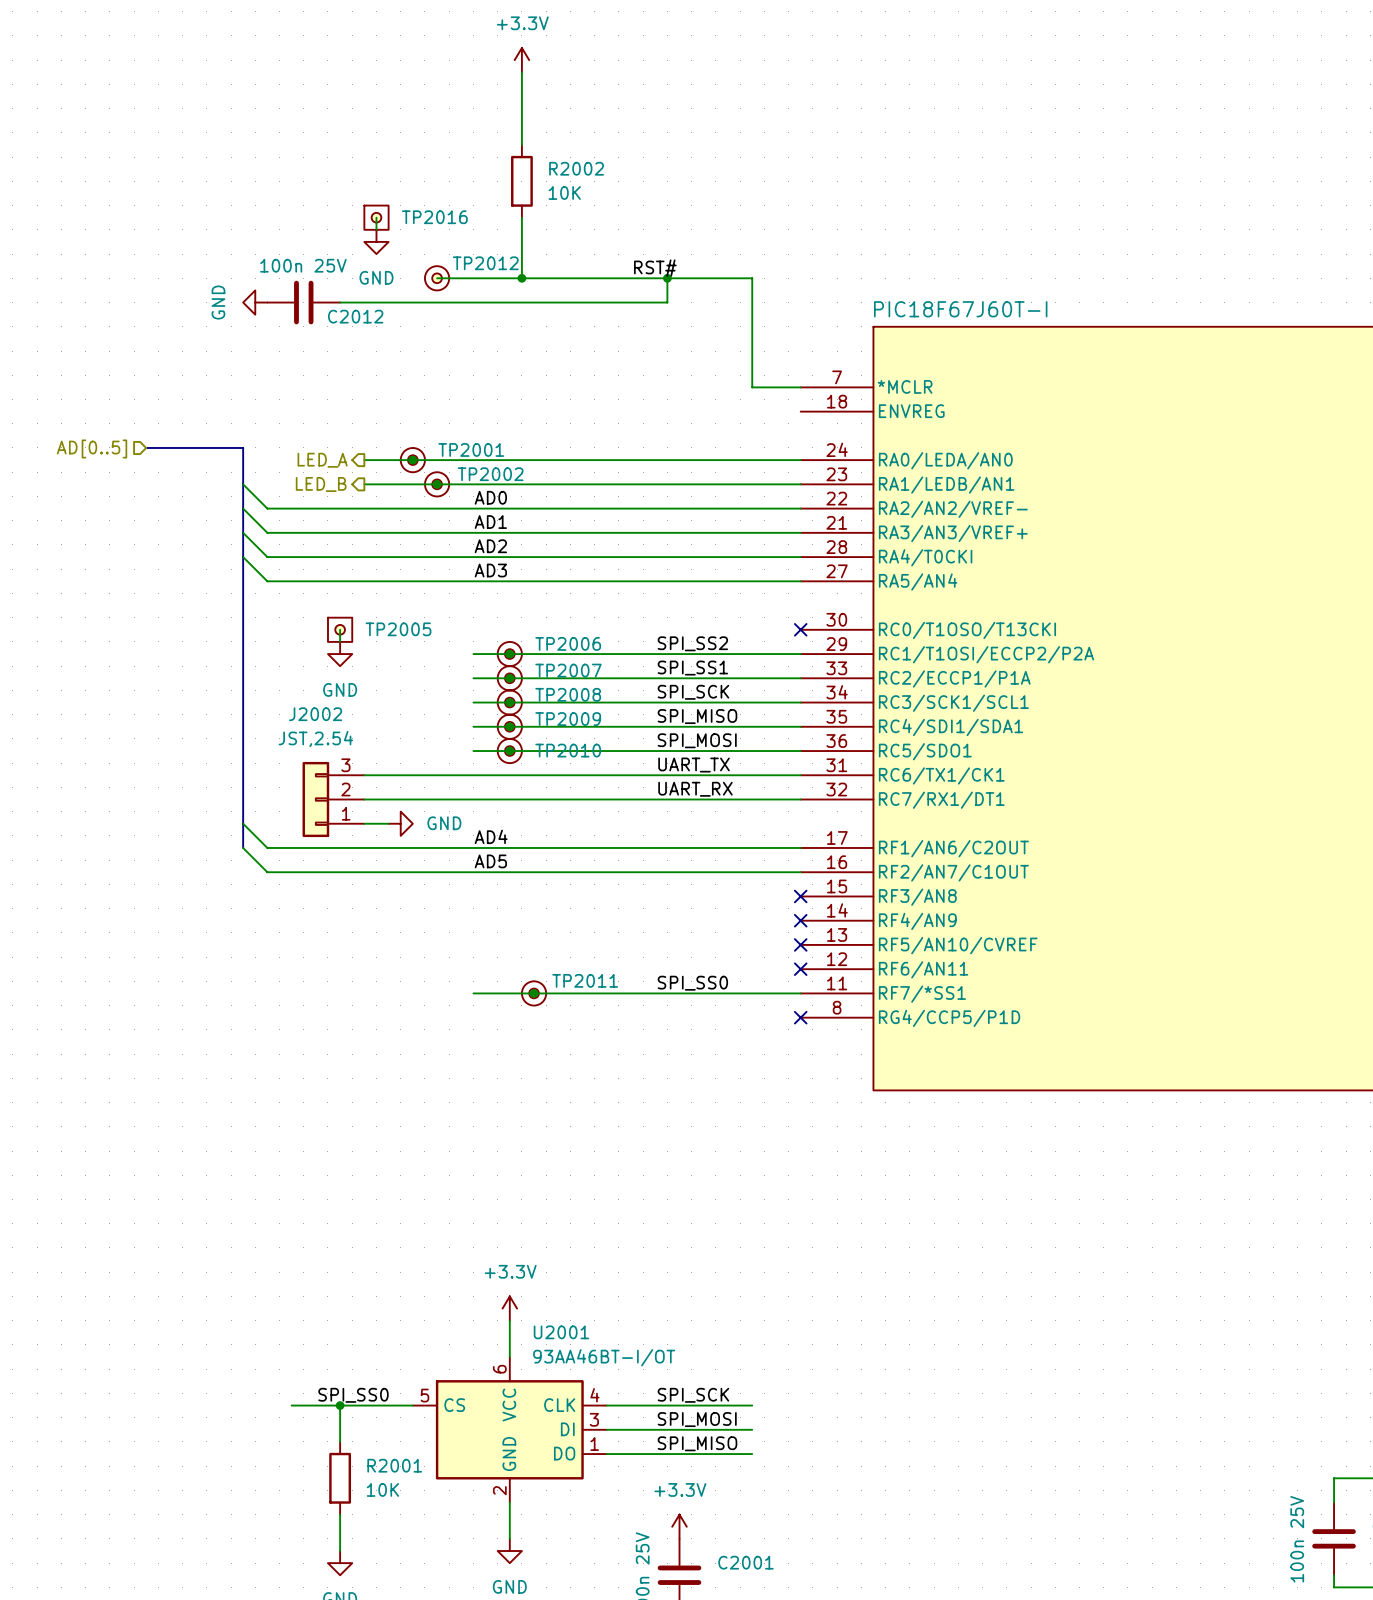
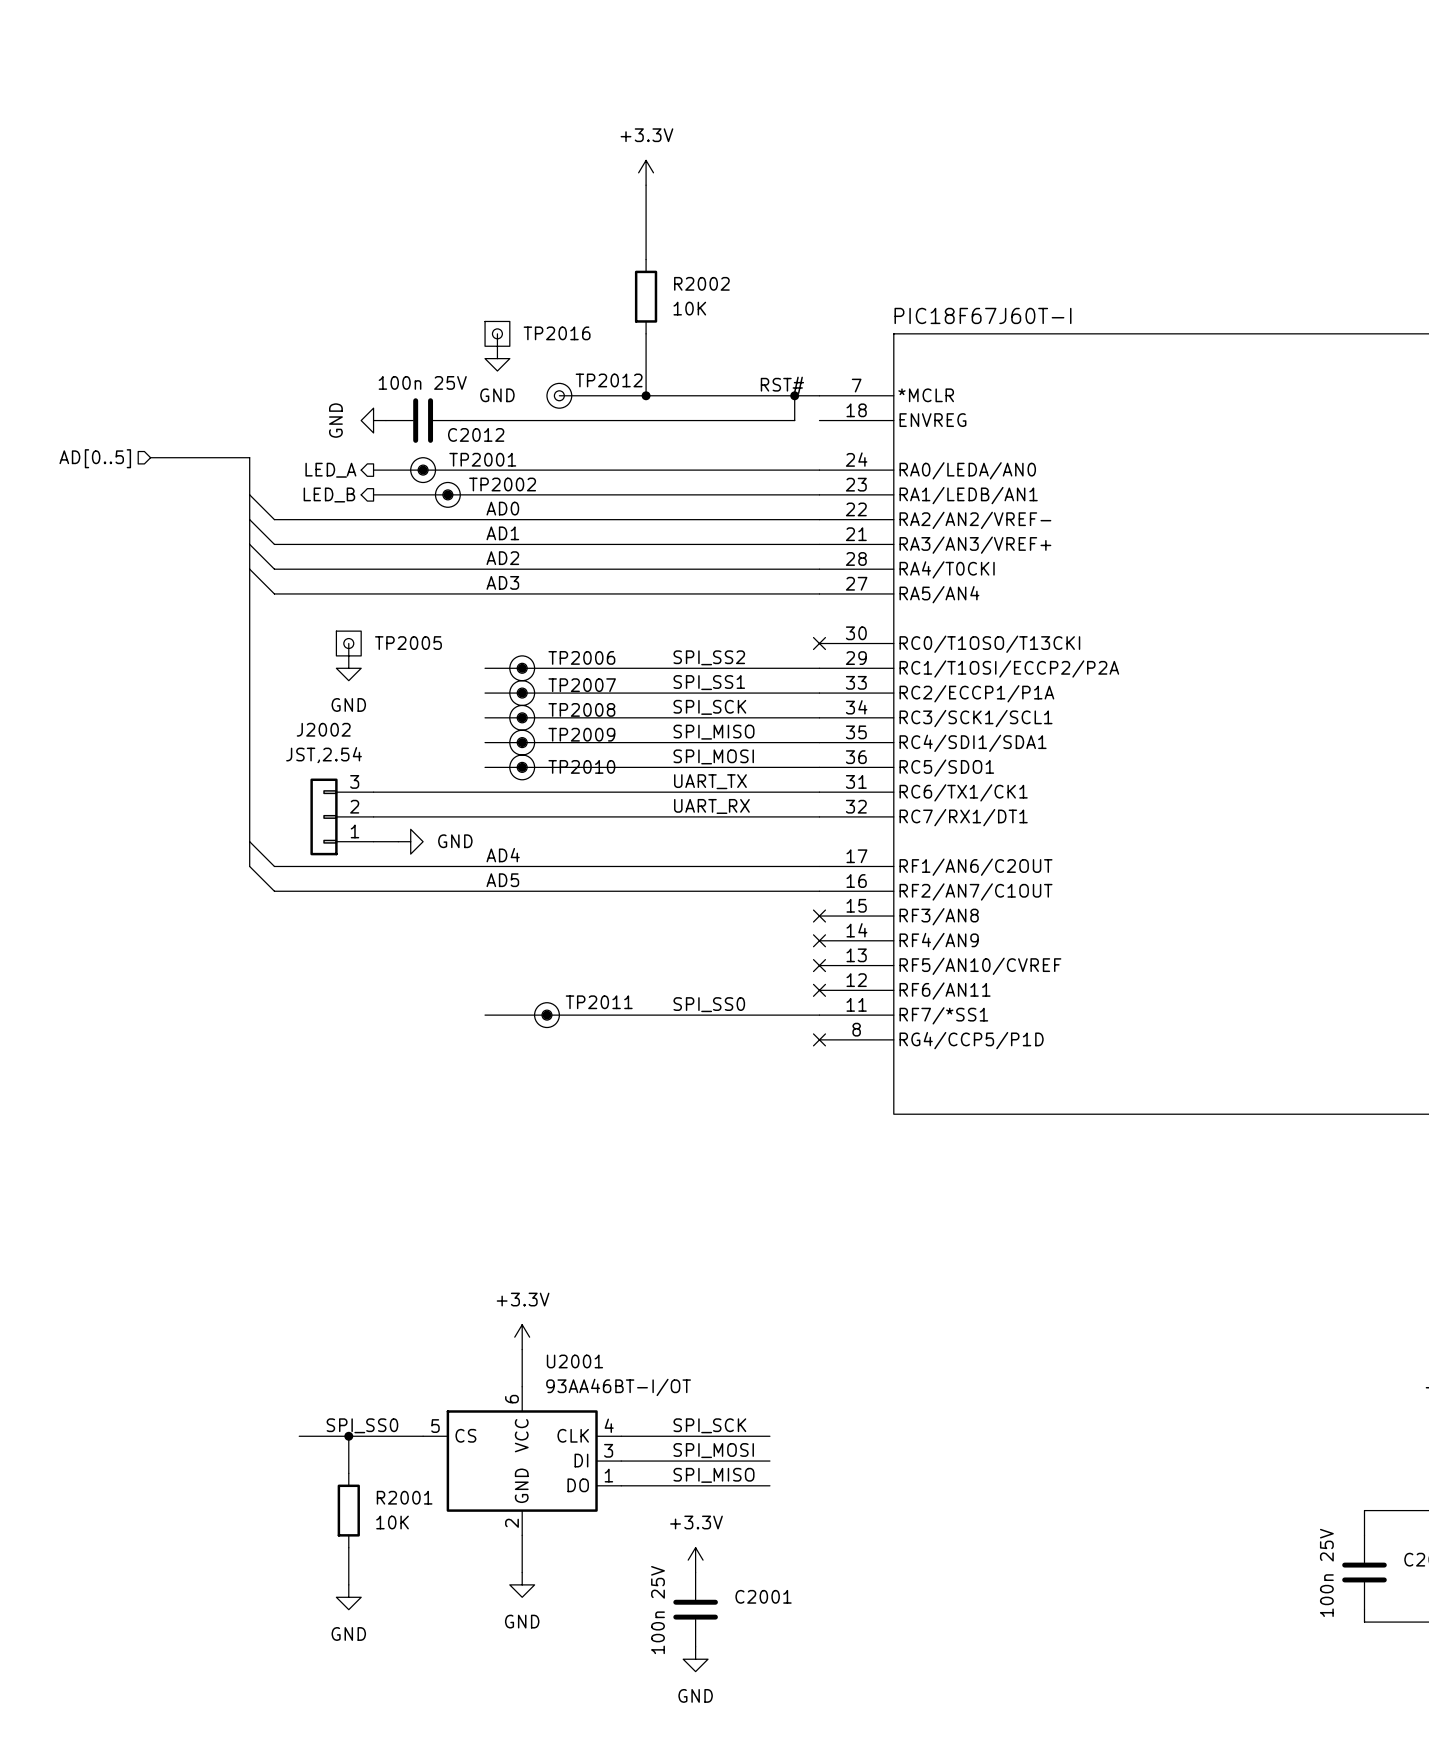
power symbol position: +3.3V (521, 60) -> +3.3V (646, 172)
wire: (521, 72) (521, 144) -> (646, 185) (646, 259)
R2002 position: (521, 181) -> (646, 296)
wire: (376, 217) (376, 229) -> (497, 333) (497, 346)
TP2016 position: (376, 217) -> (497, 333)
wire: (521, 217) (521, 278) -> (646, 333) (646, 395)
power symbol: GND (376, 241) -> none
label position: RST# (655, 268) -> RST# (782, 385)
wire: (437, 278) (752, 278) (752, 387) -> (559, 395) (769, 395)
TP2012 position: (437, 278) -> (559, 395)
junction: (521, 278) -> none
wire: (667, 278) (667, 302) (340, 302) -> (794, 395) (794, 420) (460, 420)
junction: (667, 278) -> none
power symbol: GND (255, 302) -> none
C2012 position: (303, 302) -> (423, 420)
power symbol: none -> GND (497, 358)
junction: none -> (646, 395)
junction: none -> (794, 395)
power symbol: none -> GND (373, 420)

